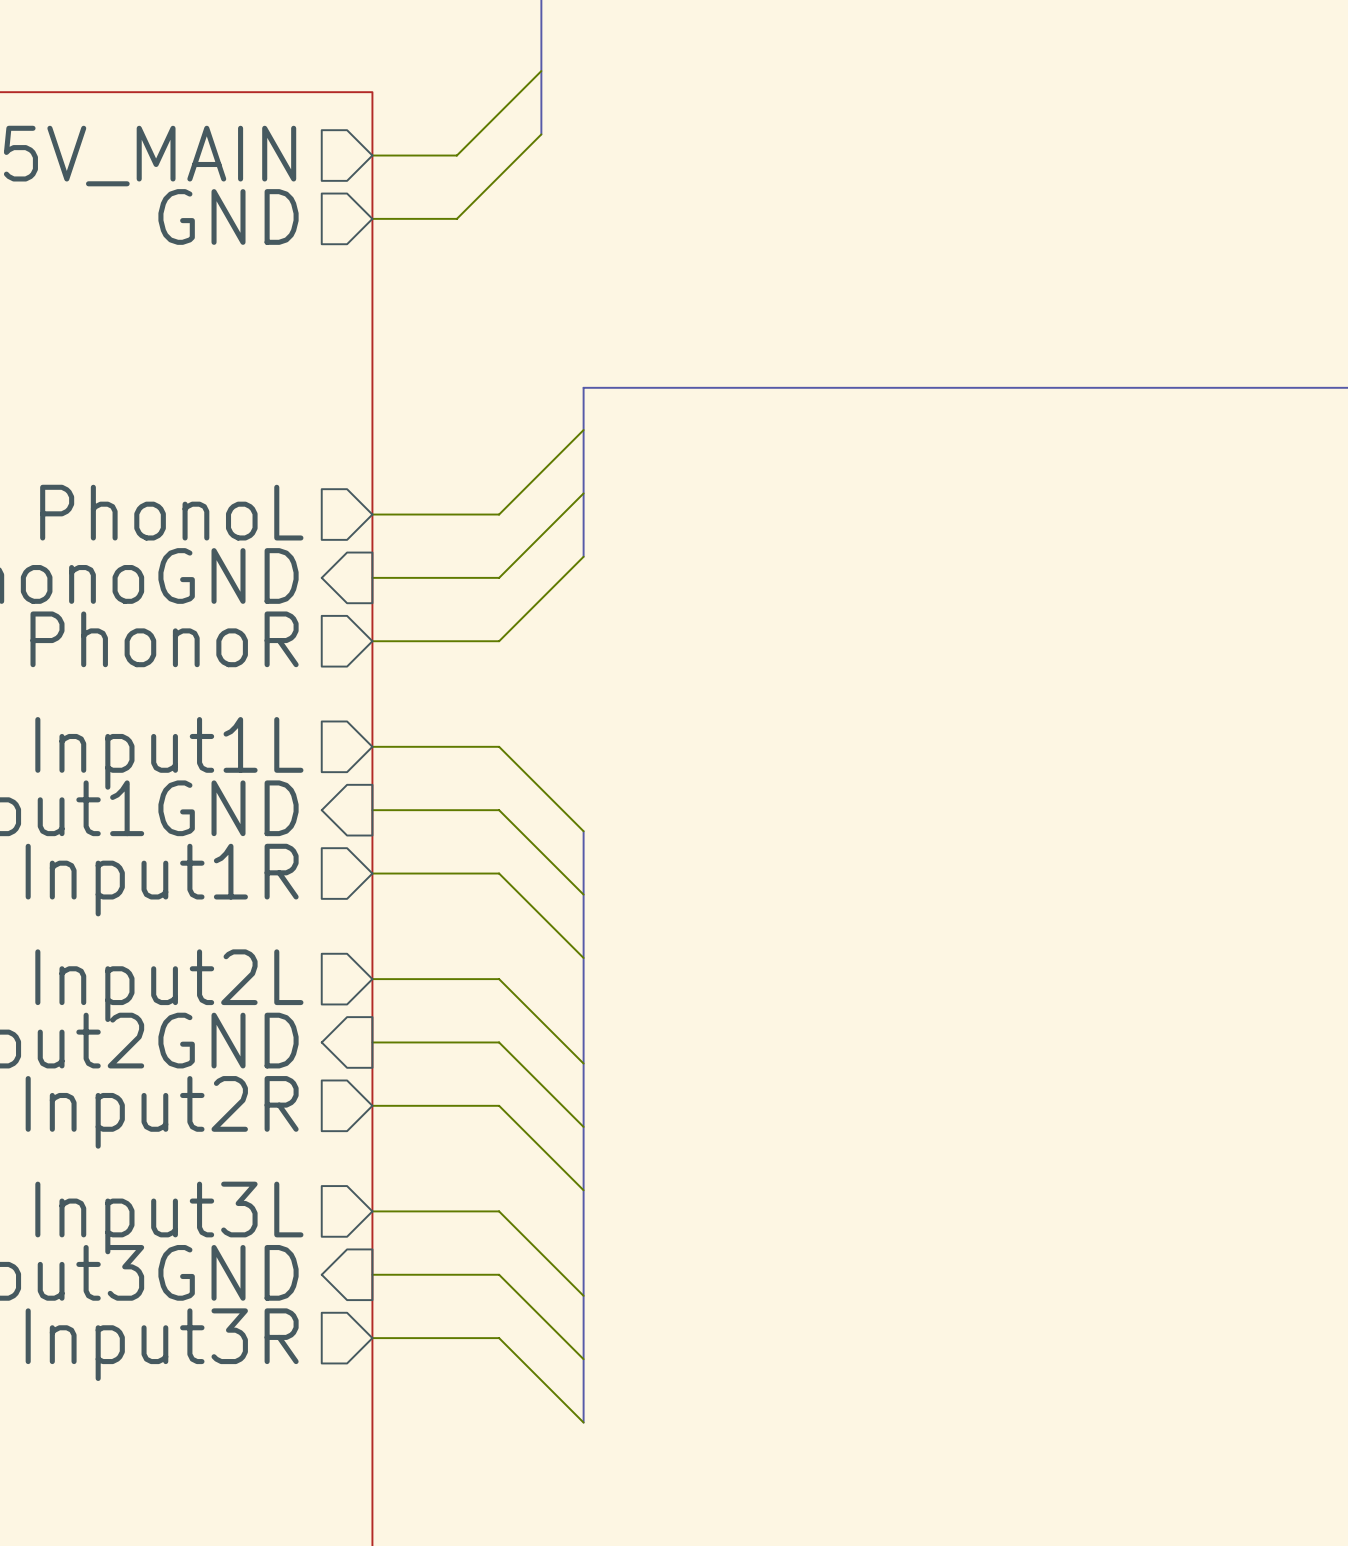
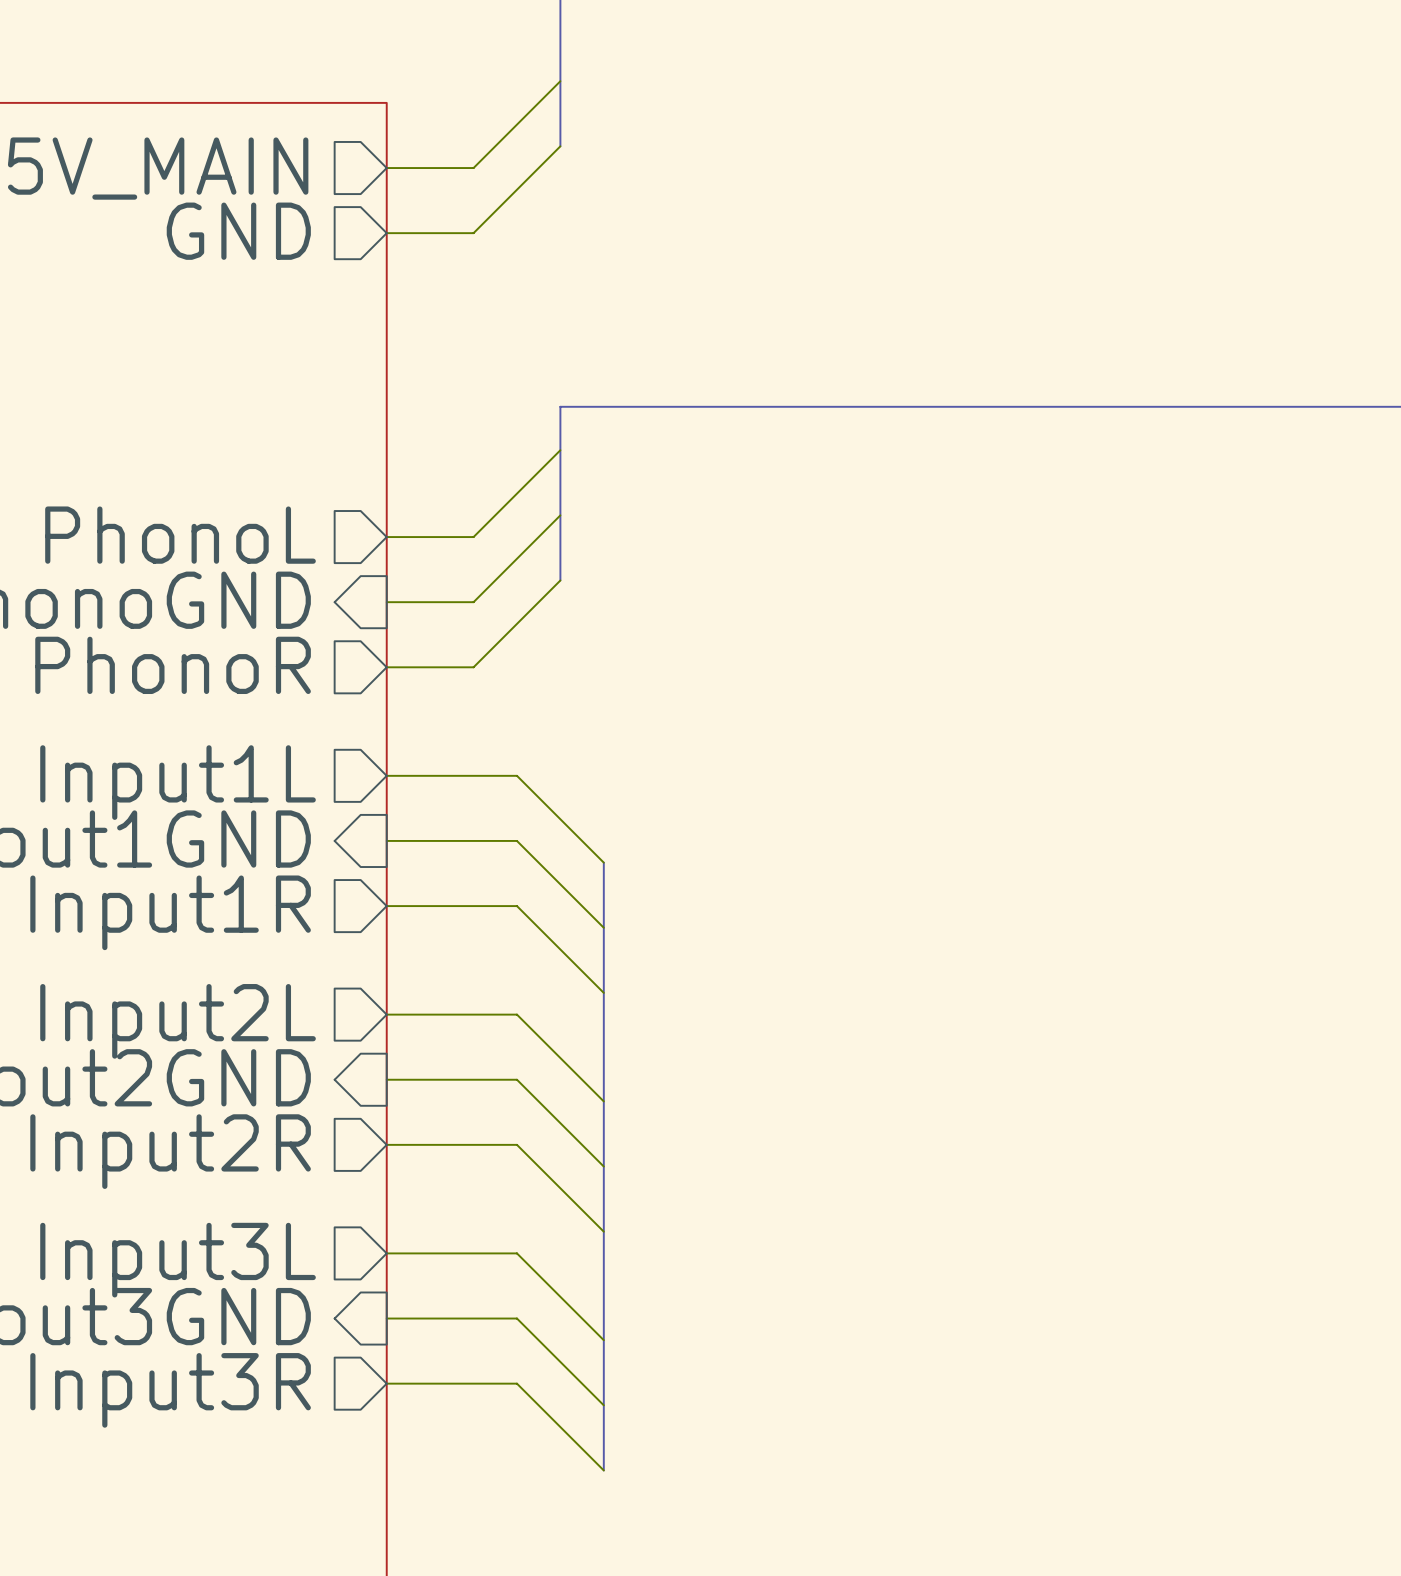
bus: (583, 387) (583, 556) -> (603, 406) (560, 406) (560, 580)
wire: (583, 430) (499, 514) (456, 514) -> (560, 450) (473, 537)
wire: (583, 493) (499, 577) (456, 577) -> (560, 515) (473, 602)
wire: (583, 556) (499, 641) (456, 641) -> (560, 580) (473, 667)

